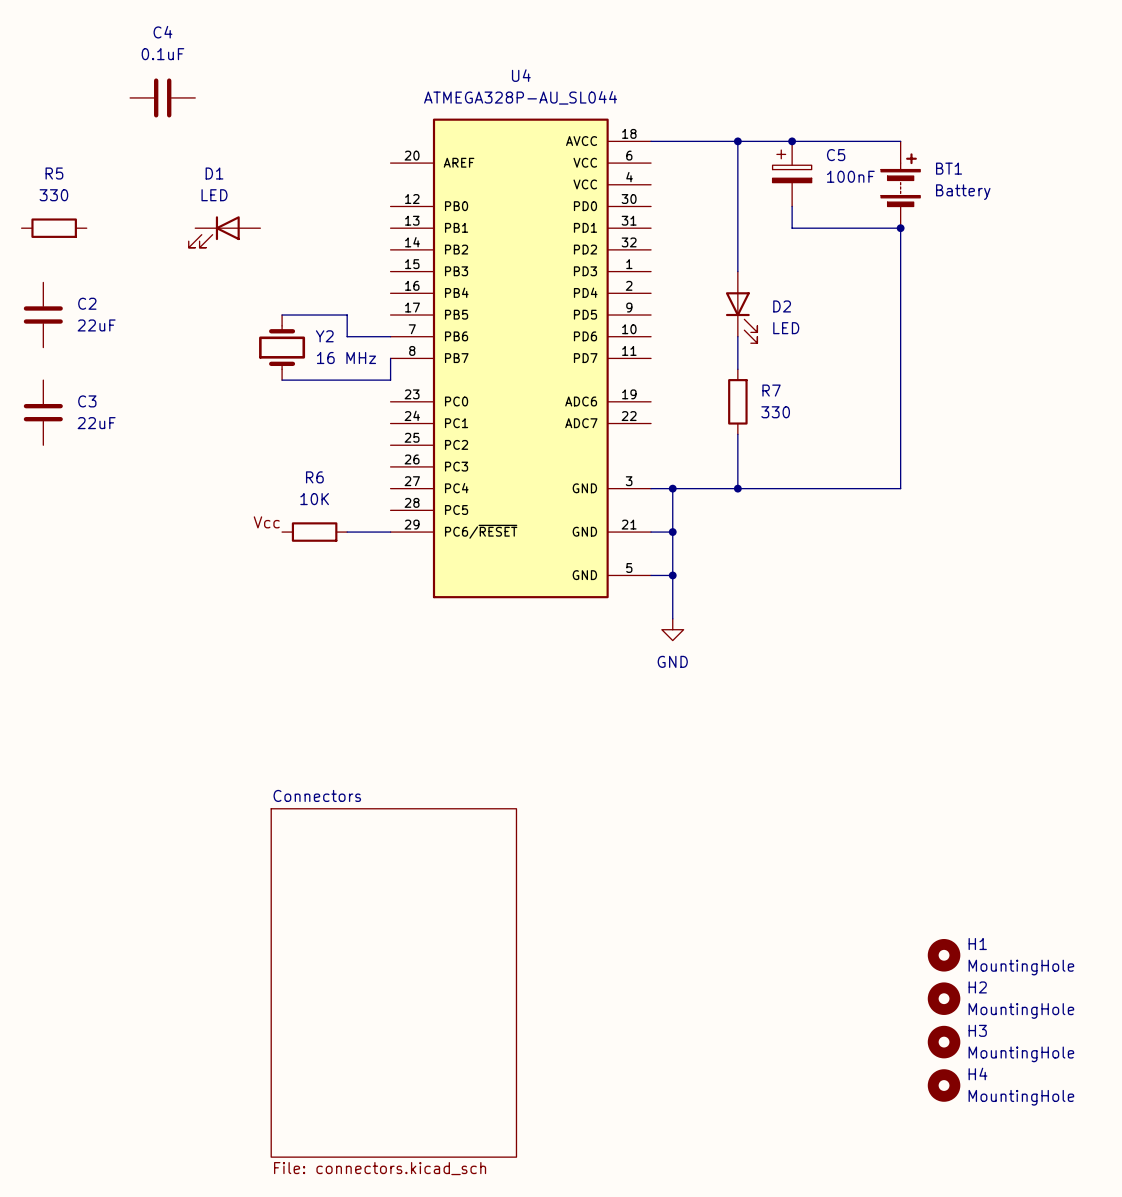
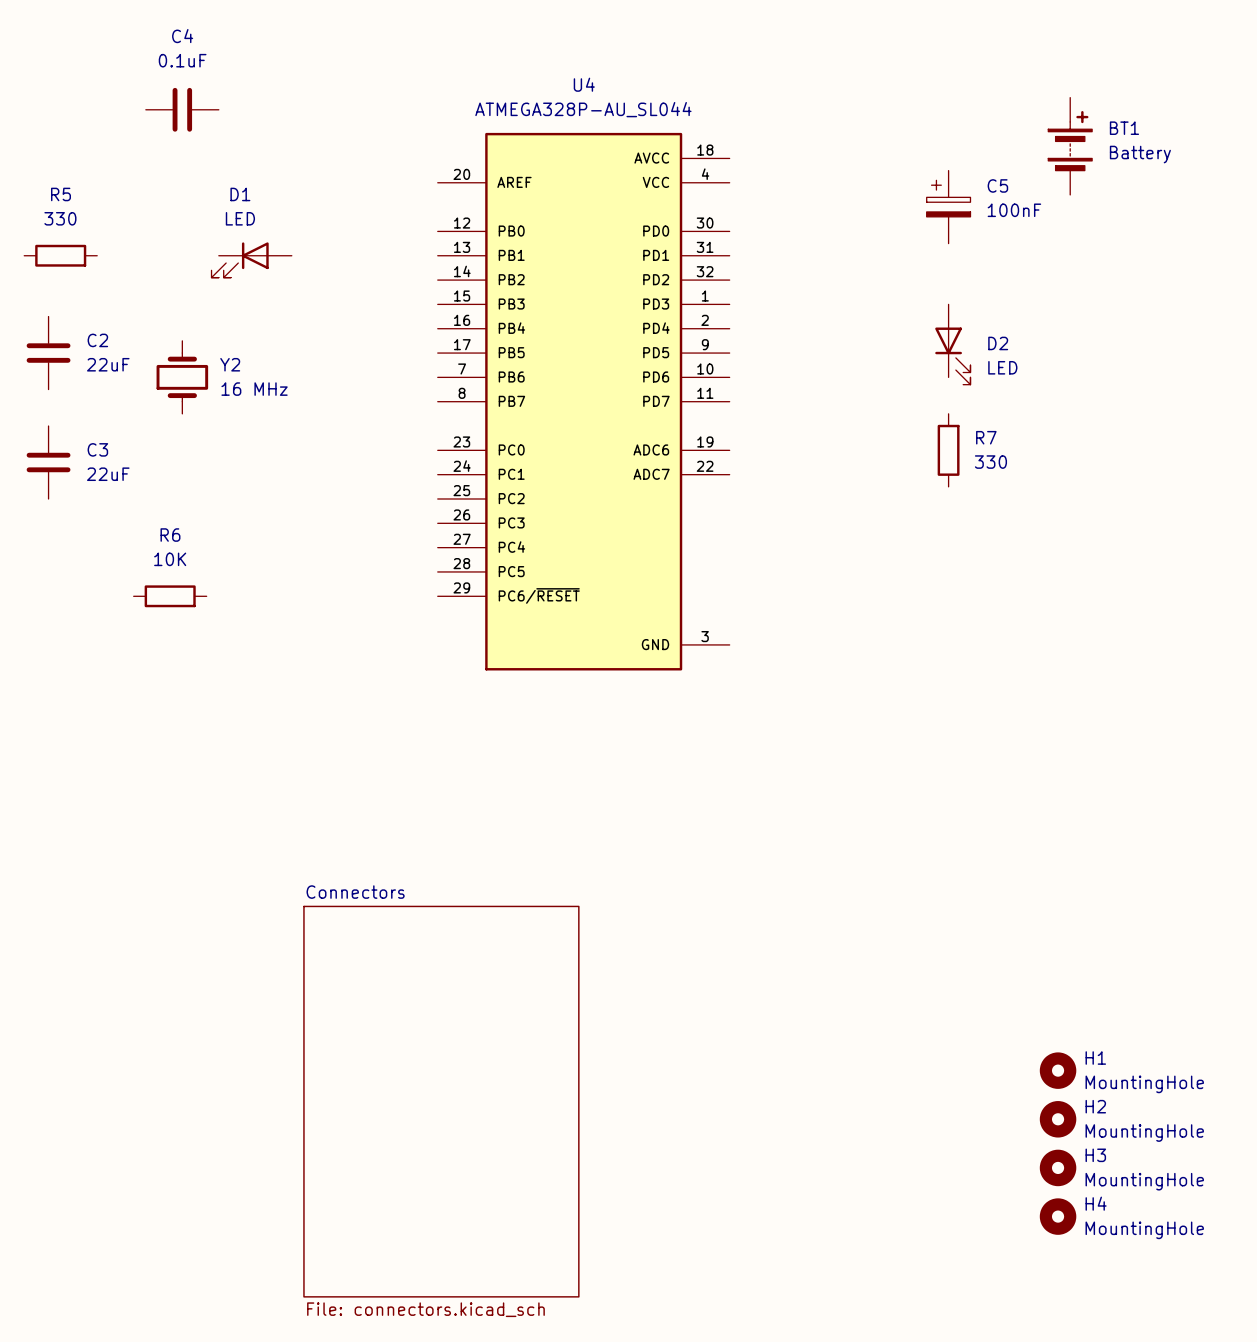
U4 symbol: [390, 118, 652, 599] -> [437, 132, 730, 671]
wire: (651, 141) (900, 141) -> none
wire: (737, 141) (737, 271) -> none
junction: (737, 141) -> none
junction: (792, 141) -> none
C5 position: (792, 173) -> (948, 207)
BT1 position: (900, 184) -> (1070, 146)
wire: (792, 206) (792, 228) (900, 228) (900, 488) (651, 488) -> none
junction: (900, 228) -> none
D2 position: (741, 307) -> (952, 344)
wire: (282, 315) (347, 315) (347, 336) (390, 336) -> none
wire: (737, 336) (737, 369) -> none
Y2 position: (282, 347) -> (182, 377)
wire: (390, 358) (390, 380) (282, 380) -> none
R7 position: (737, 401) -> (948, 450)
wire: (737, 434) (737, 488) -> none
wire: (672, 488) (672, 618) -> none
junction: (672, 488) -> none
junction: (737, 488) -> none
label: Vcc (266, 522) -> none
R6 position: (314, 532) -> (170, 596)
wire: (347, 532) (390, 532) -> none
wire: (651, 532) (672, 532) -> none
junction: (672, 532) -> none
wire: (651, 575) (672, 575) -> none
junction: (672, 575) -> none
power symbol: GND (672, 629) -> none

